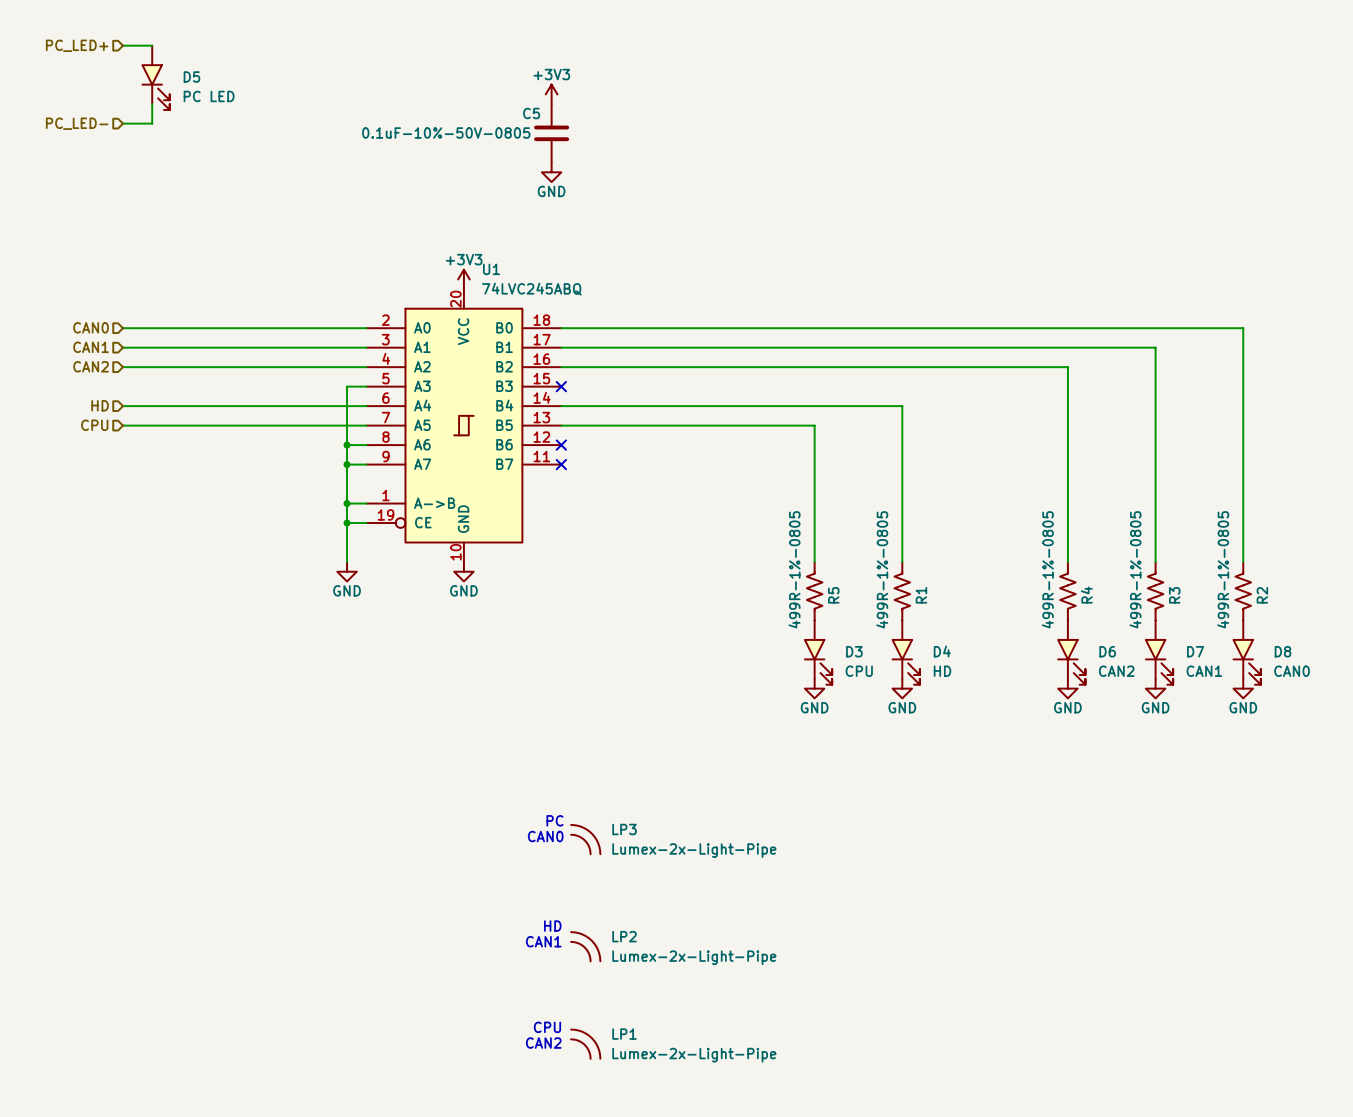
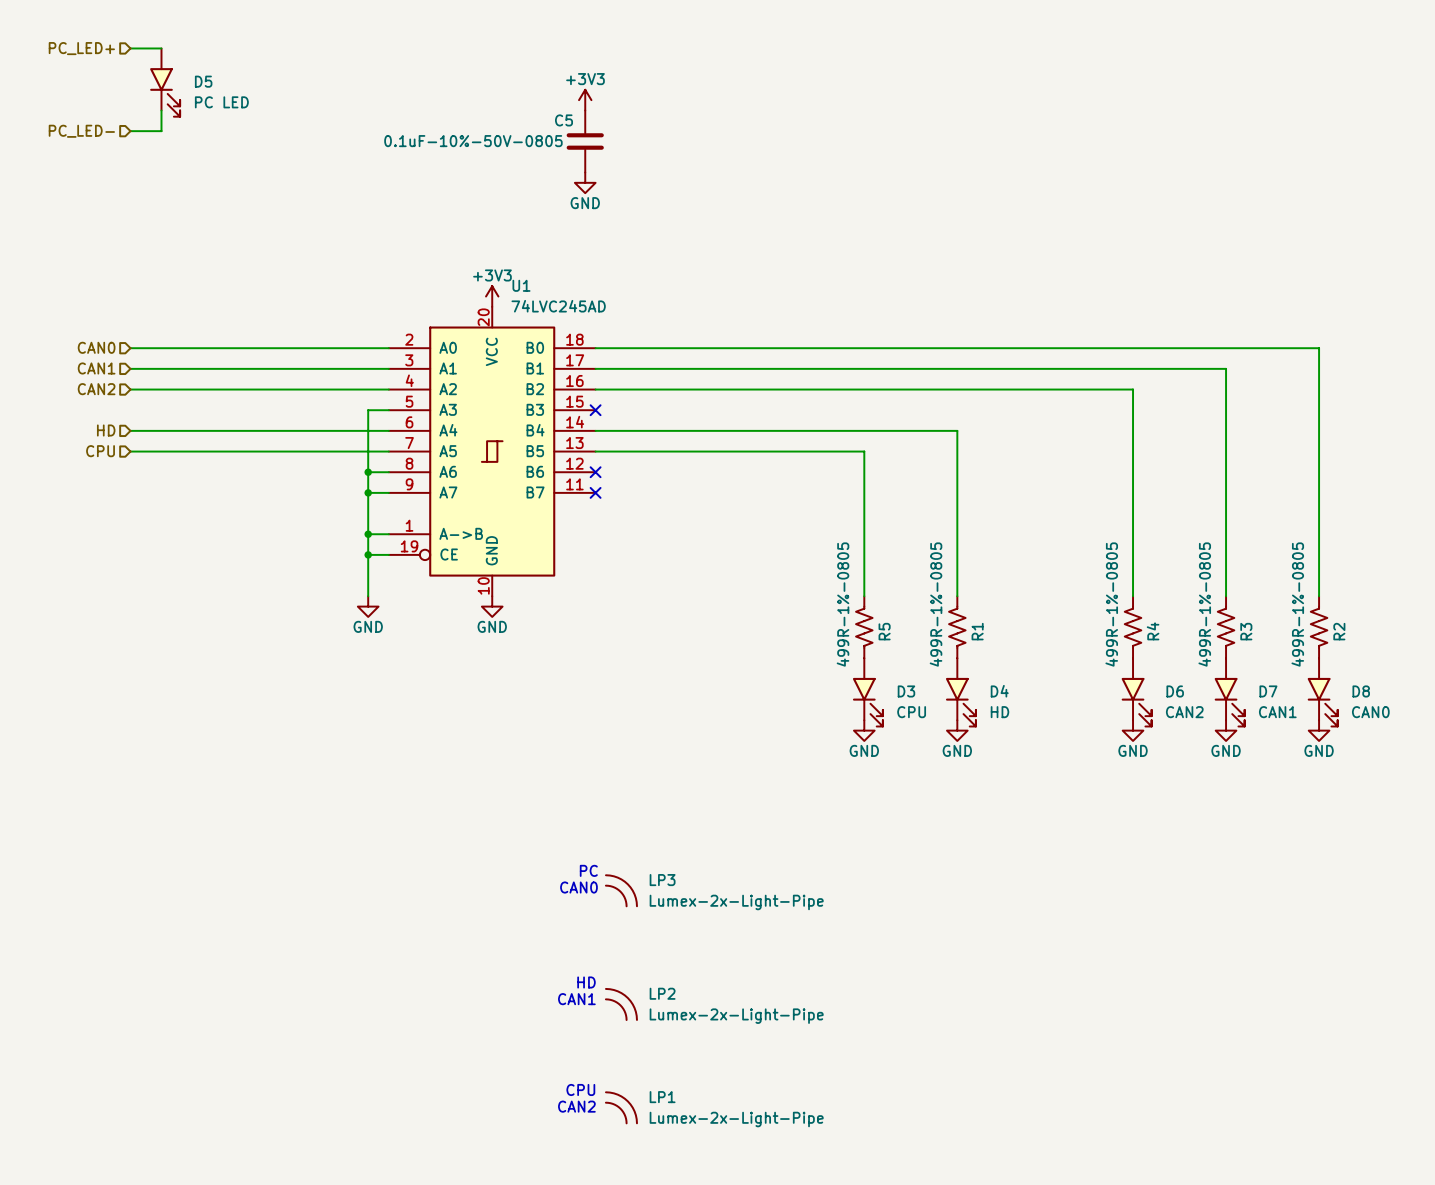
U1 value: 74LVC245ABQ (531, 289) -> 74LVC245AD (558, 306)

